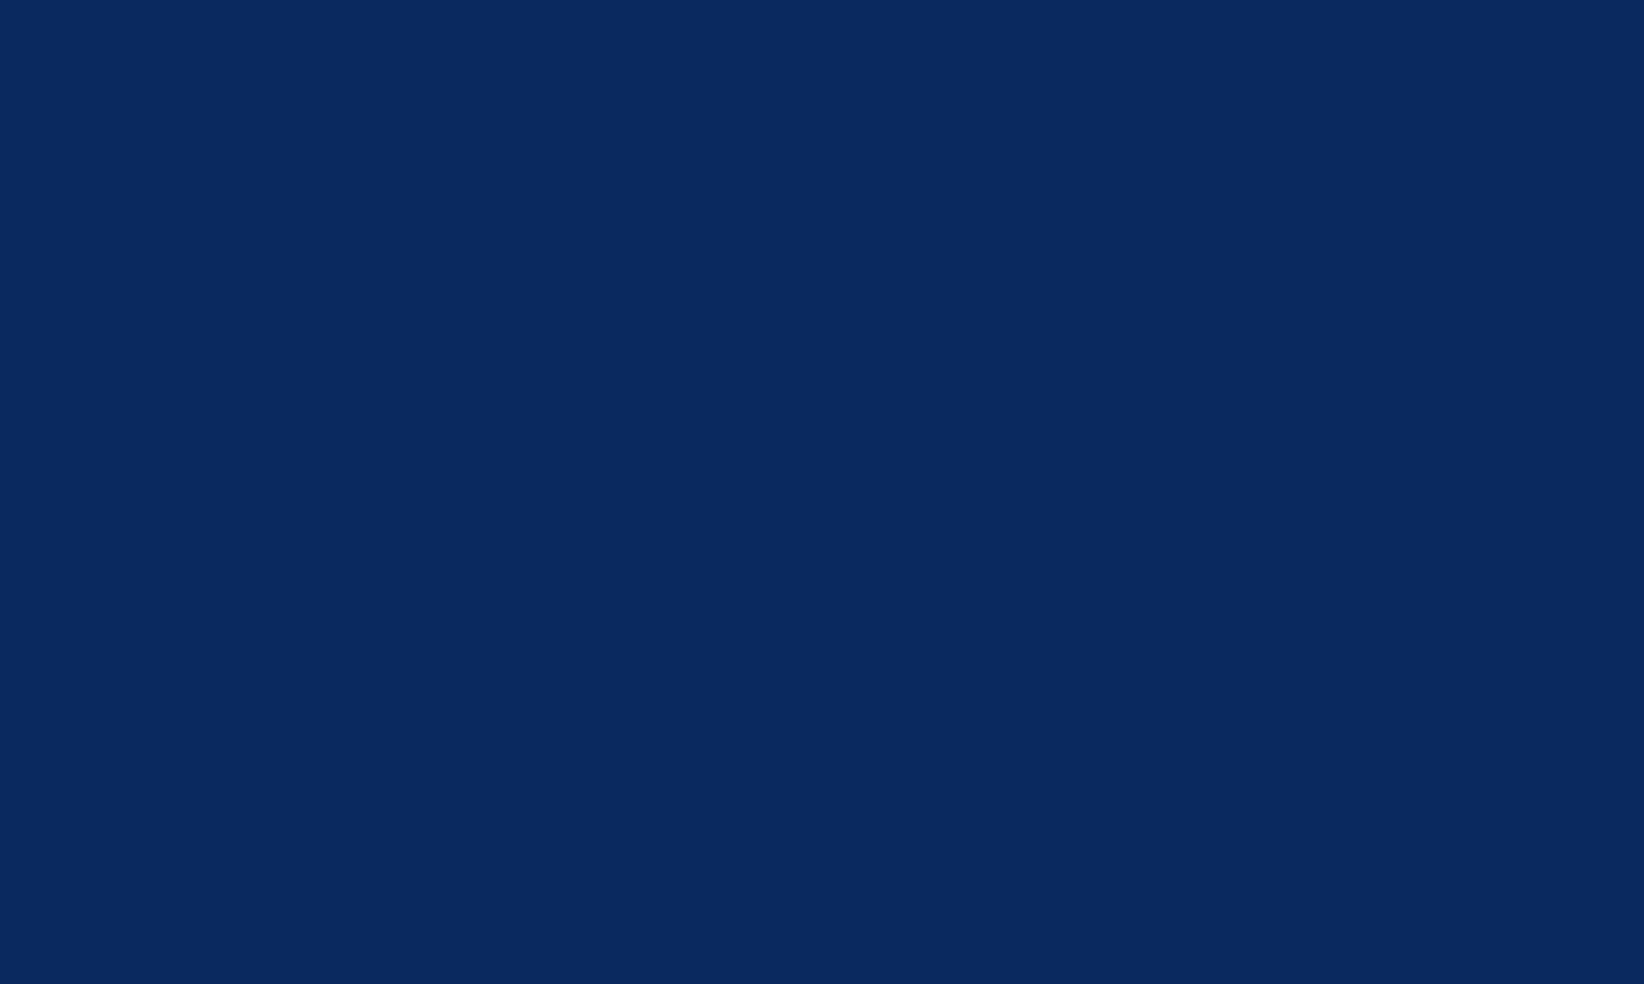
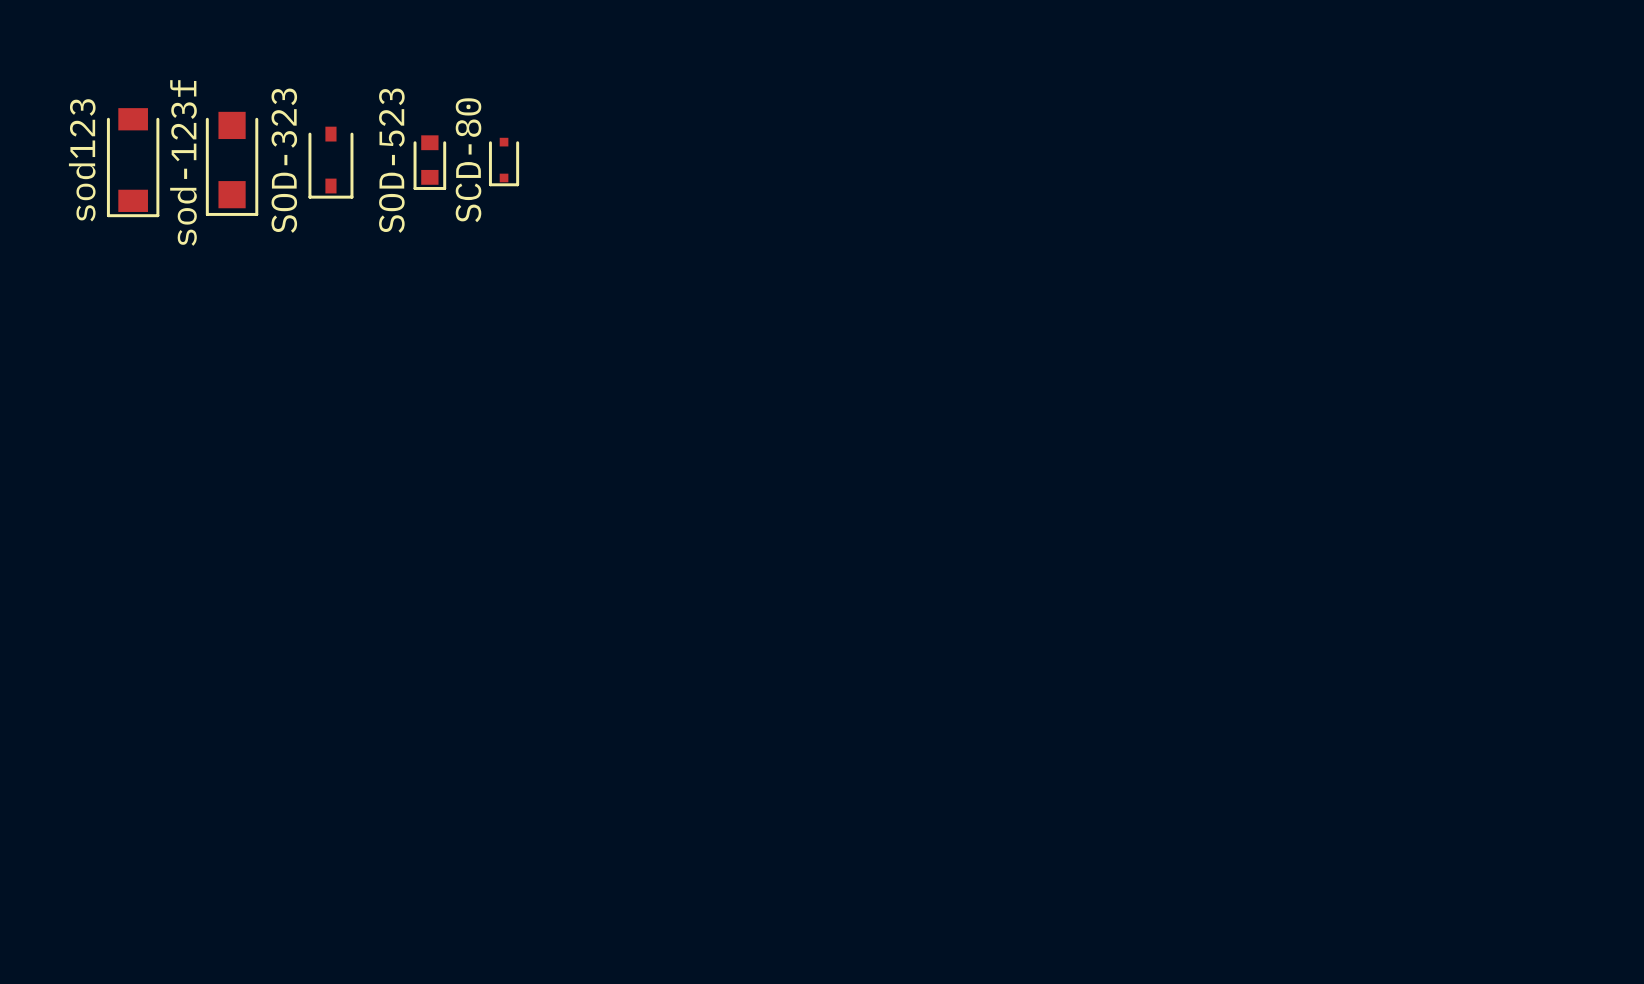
sod123: none -> (133, 162)
SOD-323: none -> (330, 162)
SOD-523: none -> (429, 162)
SCD-80: none -> (504, 162)
sod-123f: none -> (232, 163)

